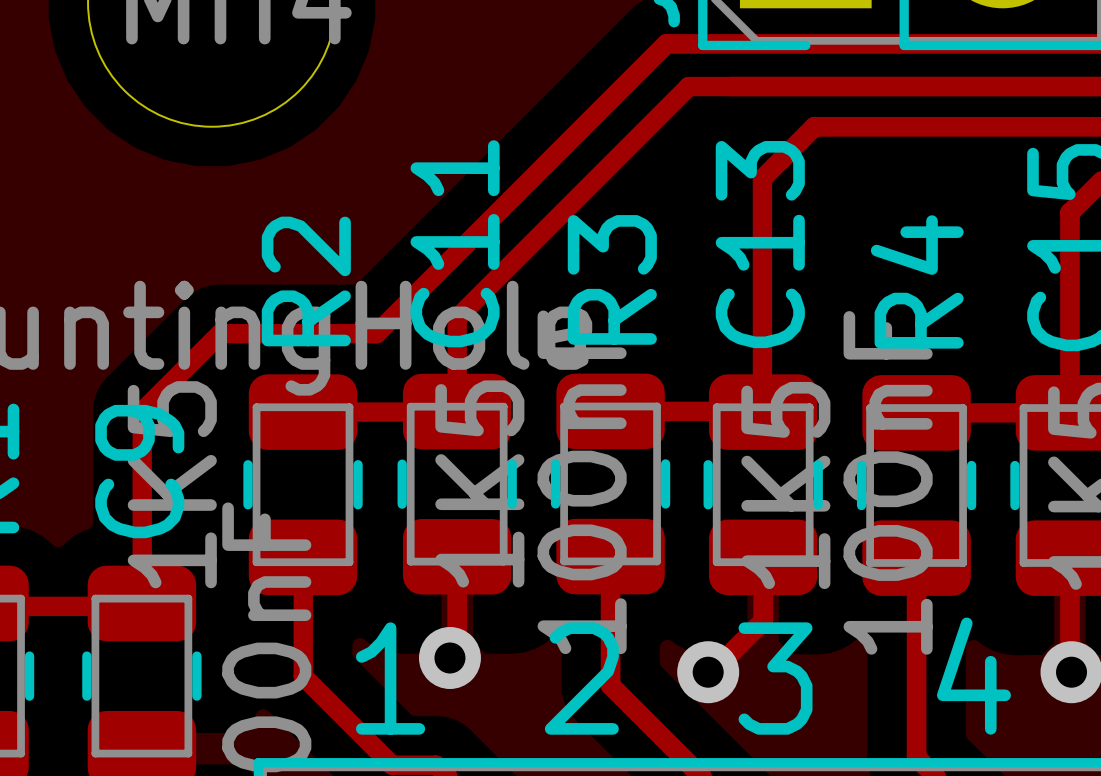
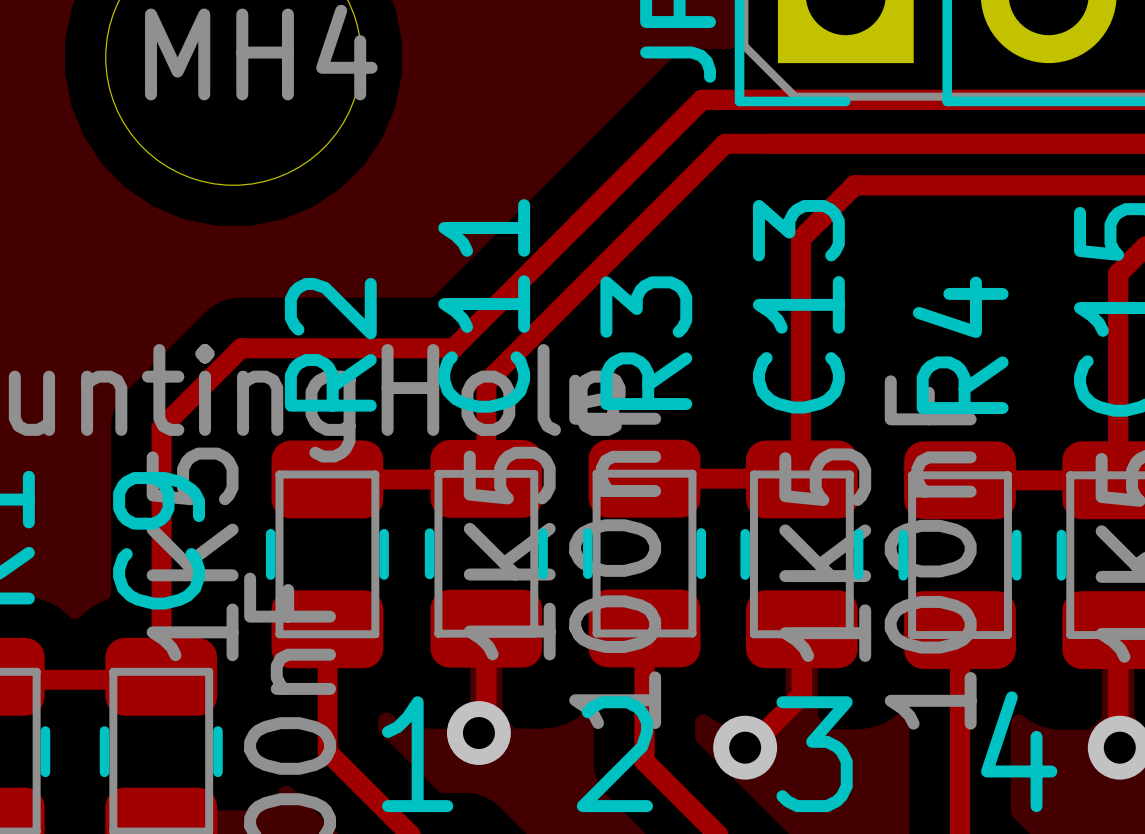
track: (425, 284) (376, 333) (220, 333) (142, 411) -> (453, 348) (241, 348) (161, 427) (161, 478)

